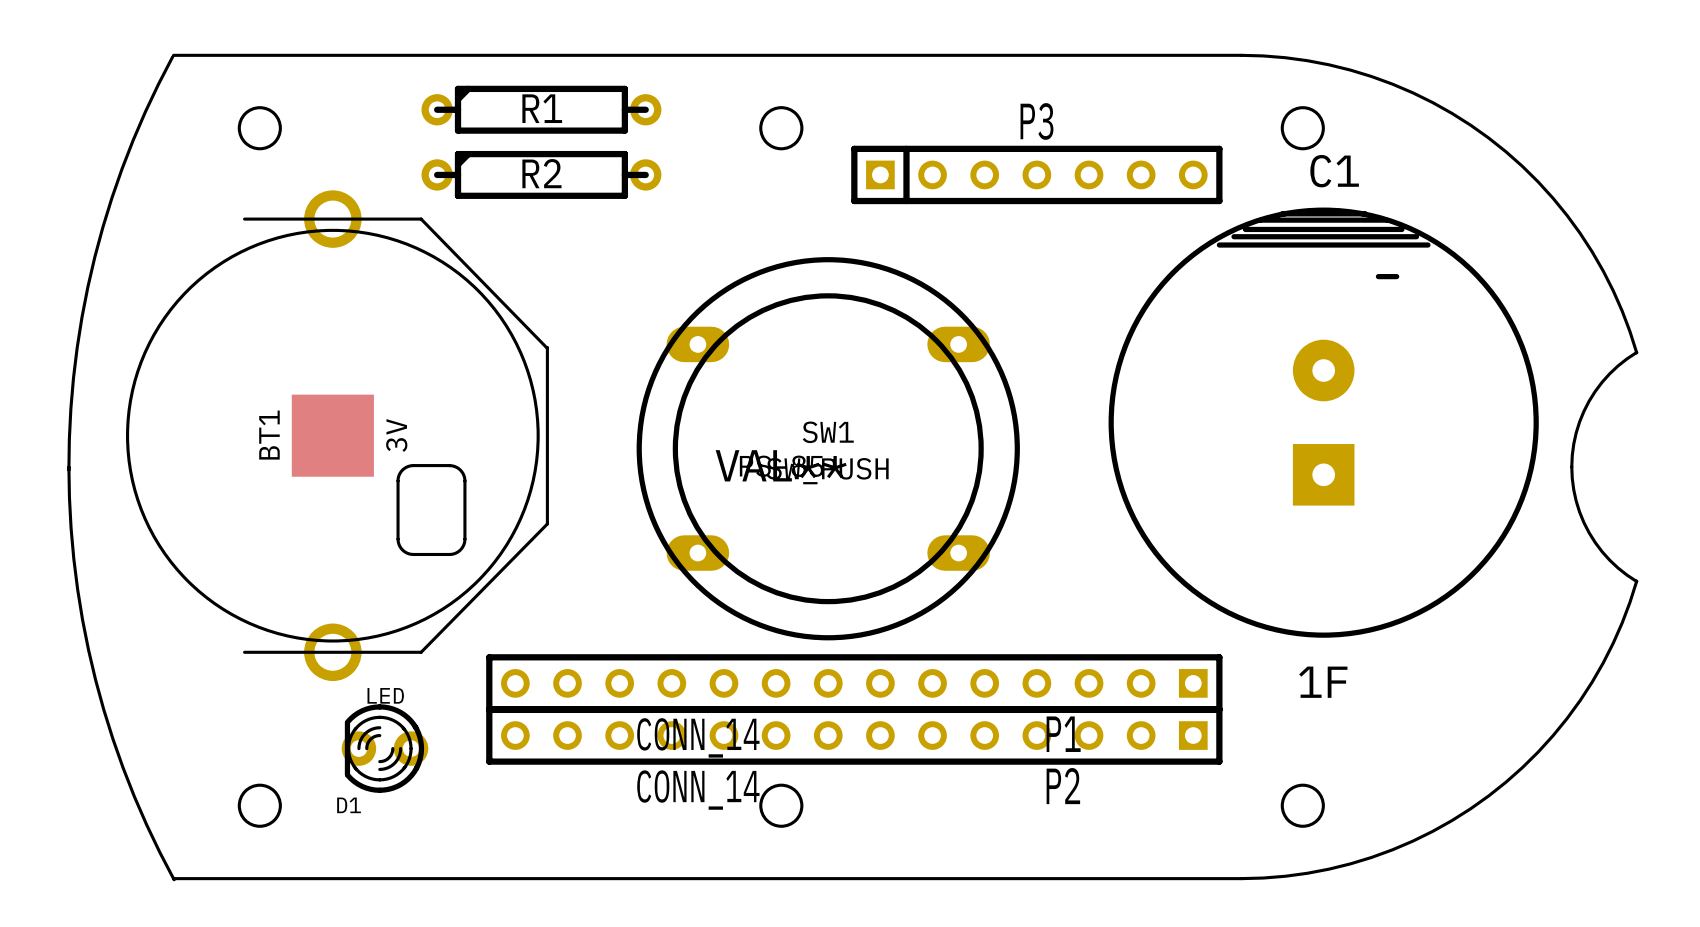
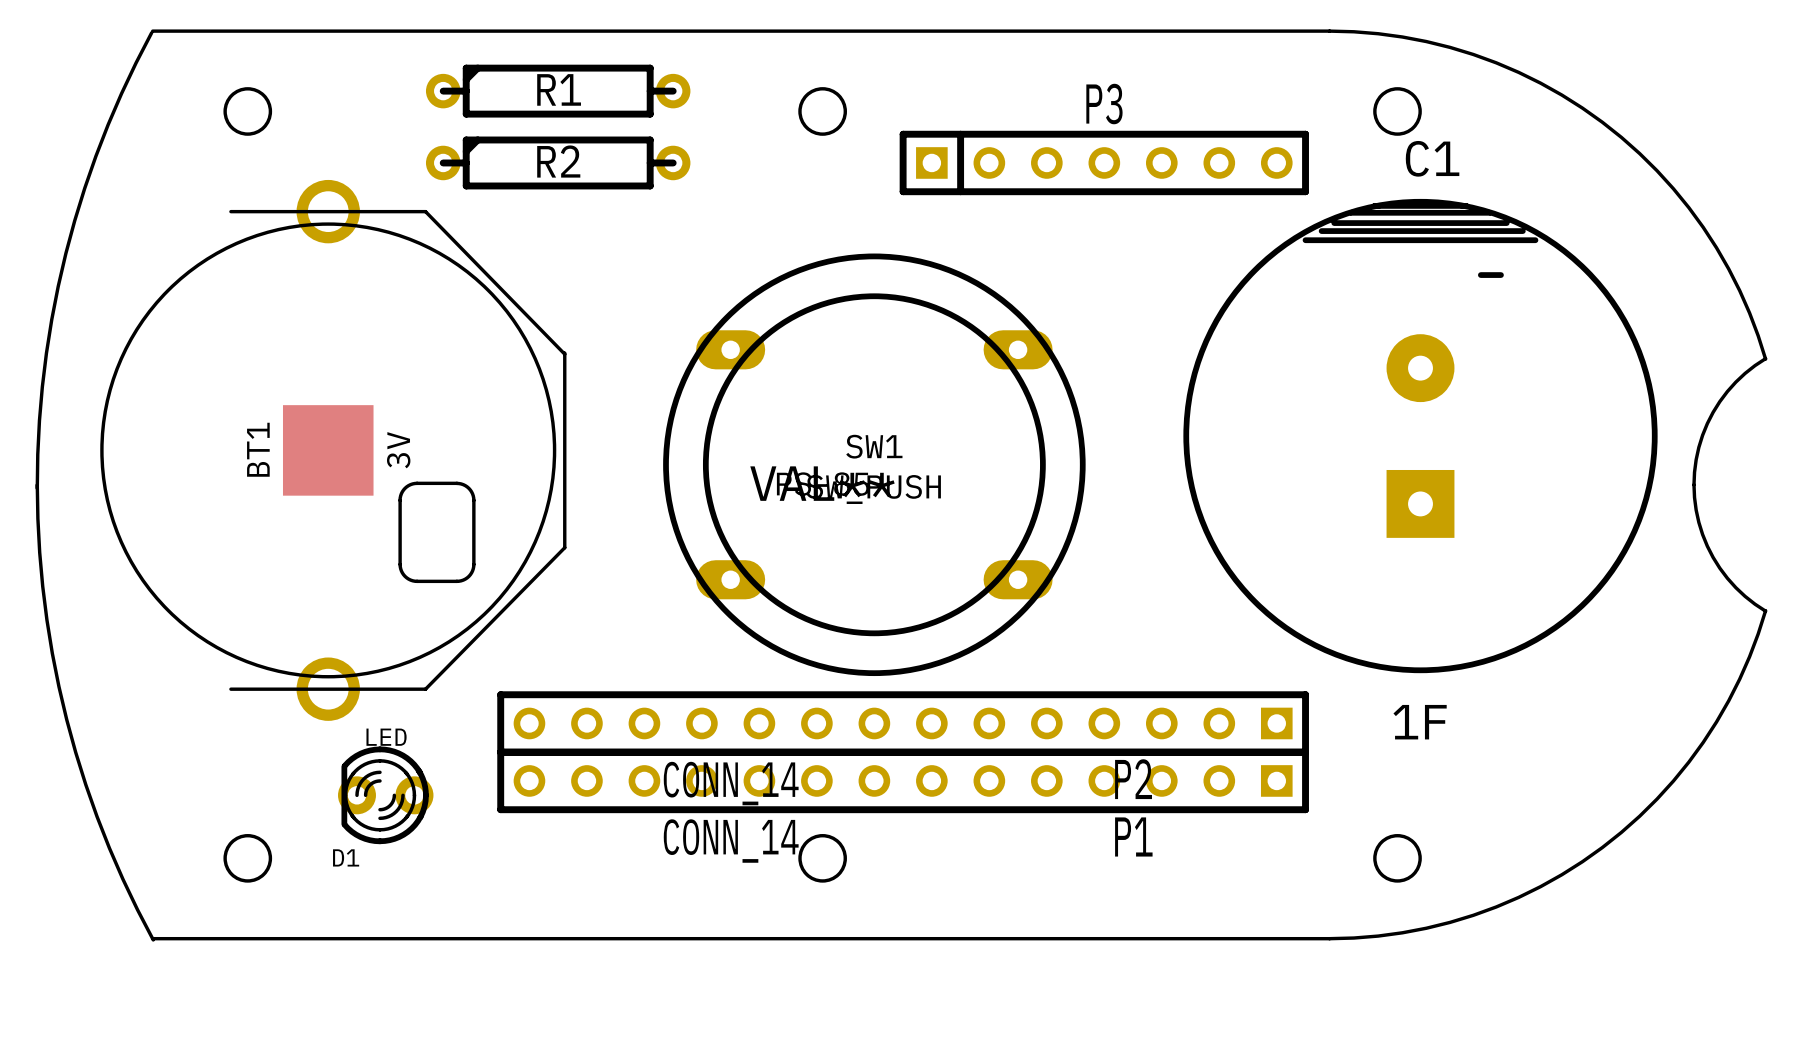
C1 footprint: [1108, 207, 1539, 638] -> [1183, 198, 1658, 674]
P1 name: P1 (1063, 734) -> P2 (1133, 779)
P2 name: P2 (1063, 786) -> P1 (1133, 836)

